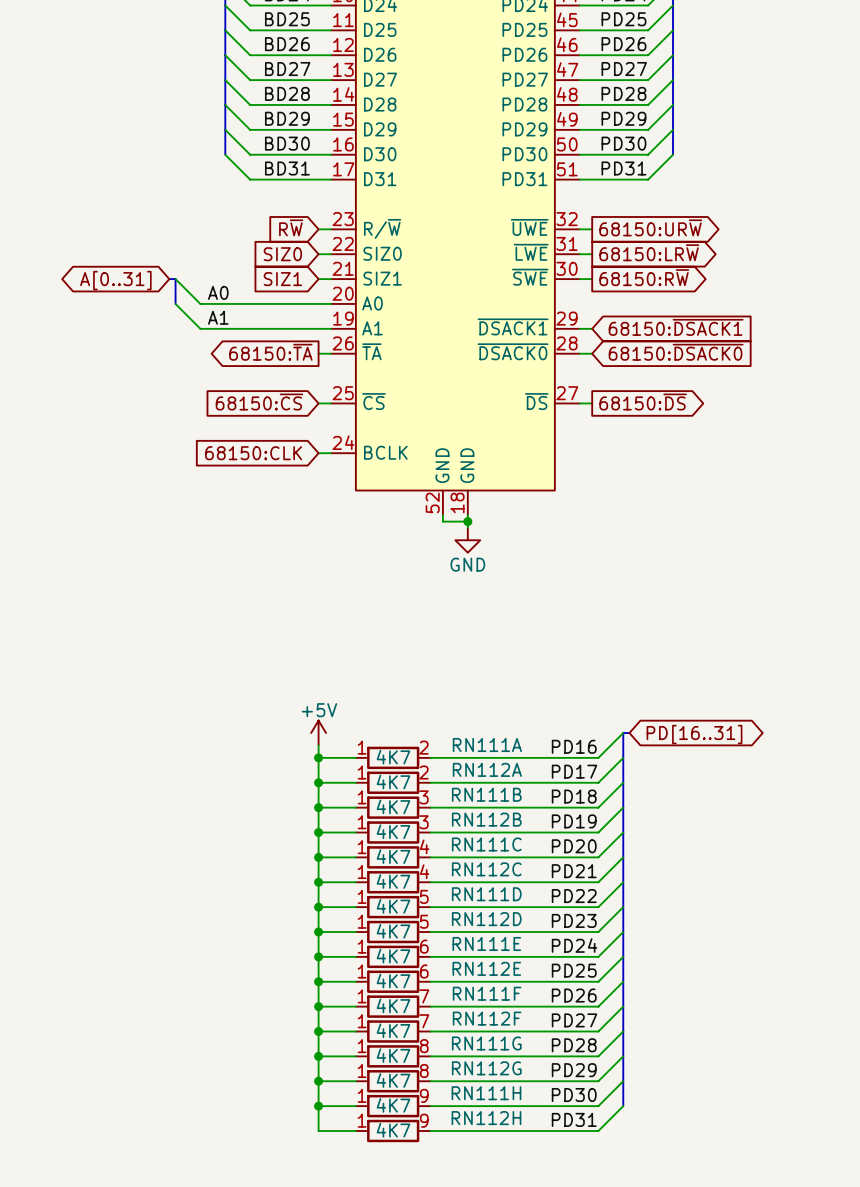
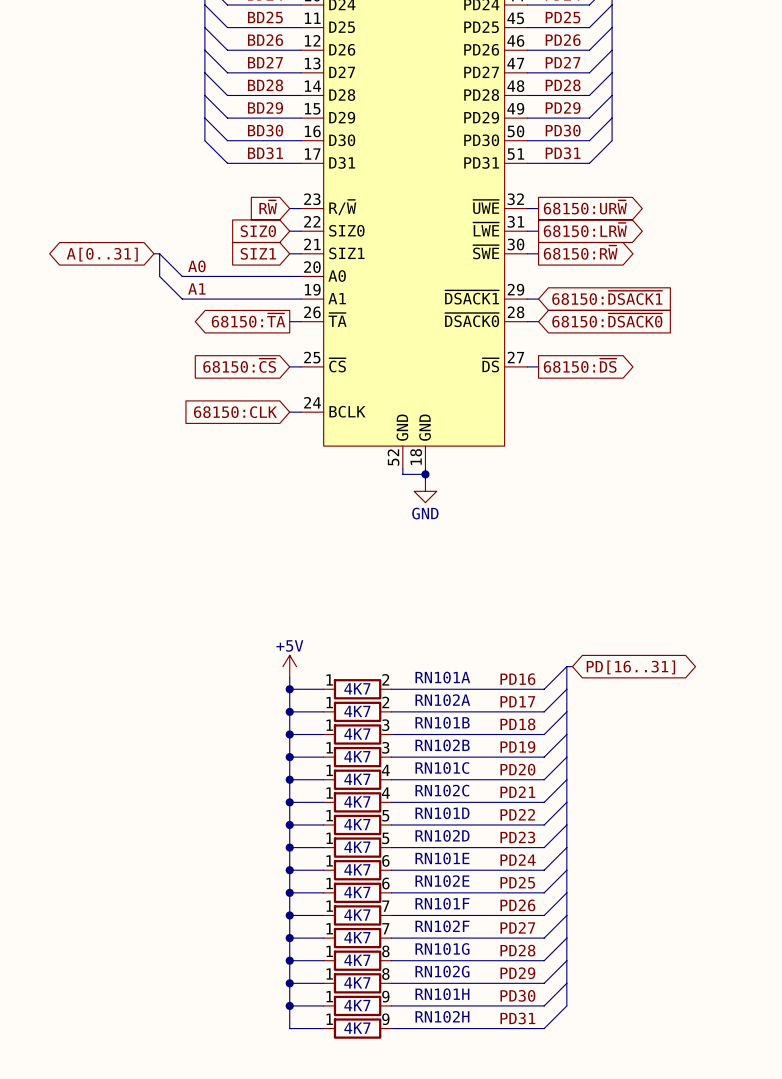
RN111A name: RN111A (487, 745) -> RN101A (442, 677)
RN112A name: RN112A (487, 769) -> RN102A (442, 700)
RN111B name: RN111B (486, 794) -> RN101B (442, 722)
RN112B name: RN112B (486, 819) -> RN102B (442, 745)
RN111C name: RN111C (486, 844) -> RN101C (442, 768)
RN112C name: RN112C (486, 869) -> RN102C (442, 790)
RN111D name: RN111D (486, 894) -> RN101D (442, 813)
RN112D name: RN112D (486, 919) -> RN102D (442, 835)
RN111E name: RN111E (486, 943) -> RN101E (442, 858)
RN112E name: RN112E (486, 968) -> RN102E (442, 881)
RN111F name: RN111F (487, 993) -> RN101F (442, 903)
RN112F name: RN112F (487, 1018) -> RN102F (442, 926)
RN111G name: RN111G (486, 1043) -> RN101G (442, 948)
RN112G name: RN112G (486, 1068) -> RN102G (442, 971)
RN111H name: RN111H (486, 1093) -> RN101H (442, 994)
RN112H name: RN112H (486, 1118) -> RN102H (442, 1016)

